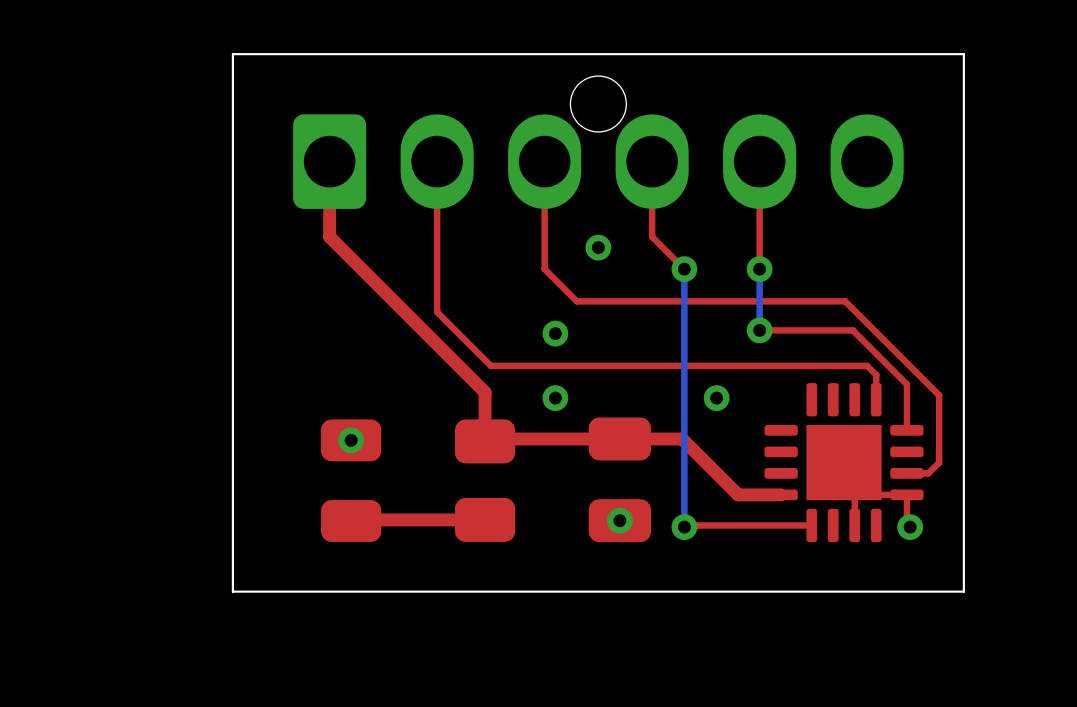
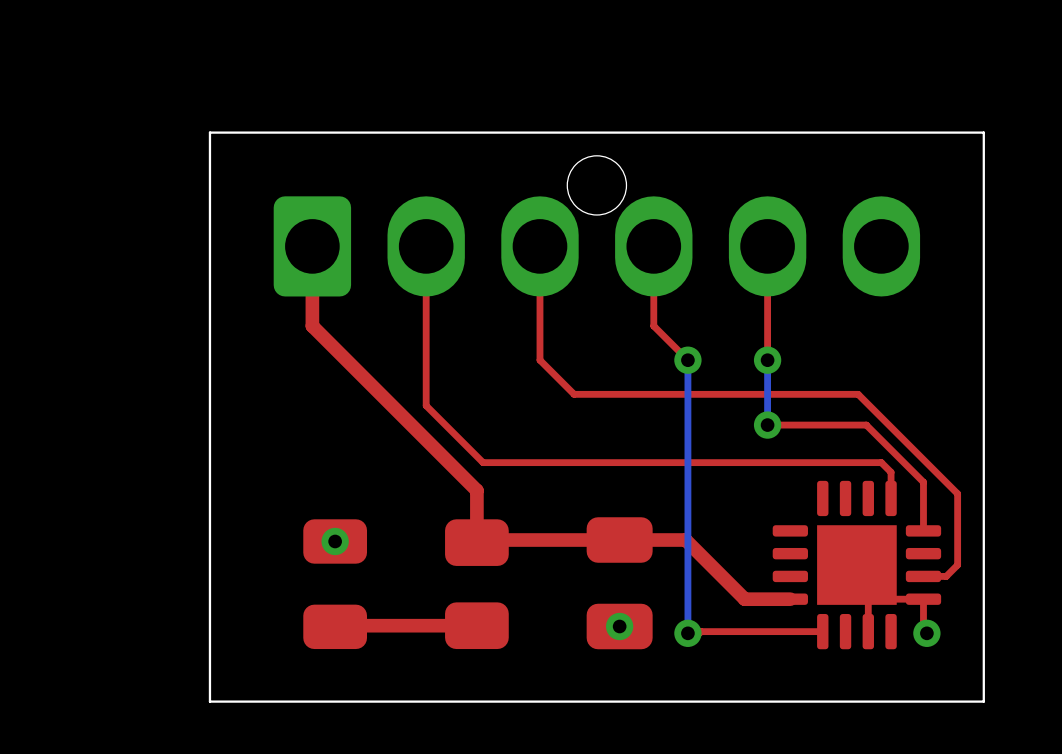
via: (598, 247) -> none
via: (555, 333) -> none
via: (555, 398) -> none
via: (716, 398) -> none

